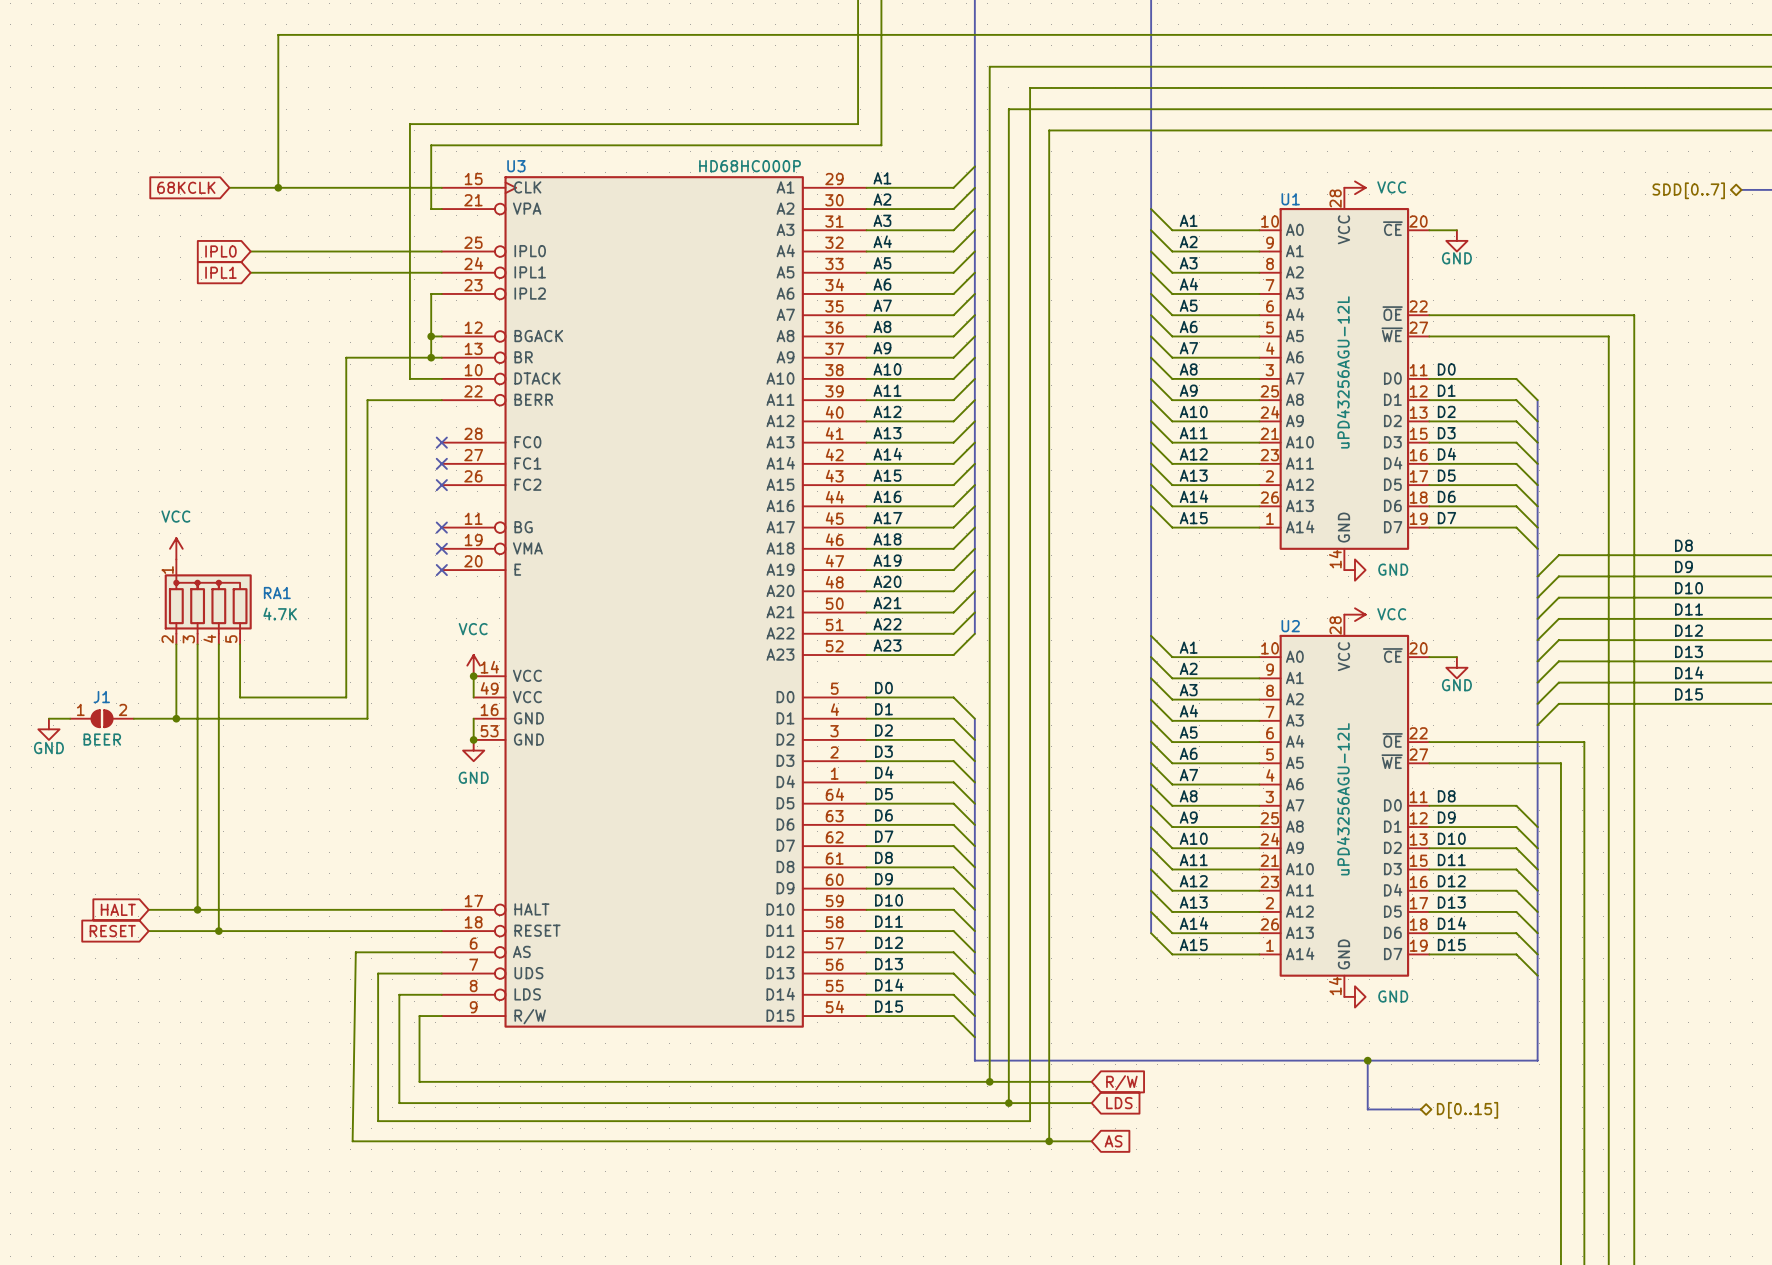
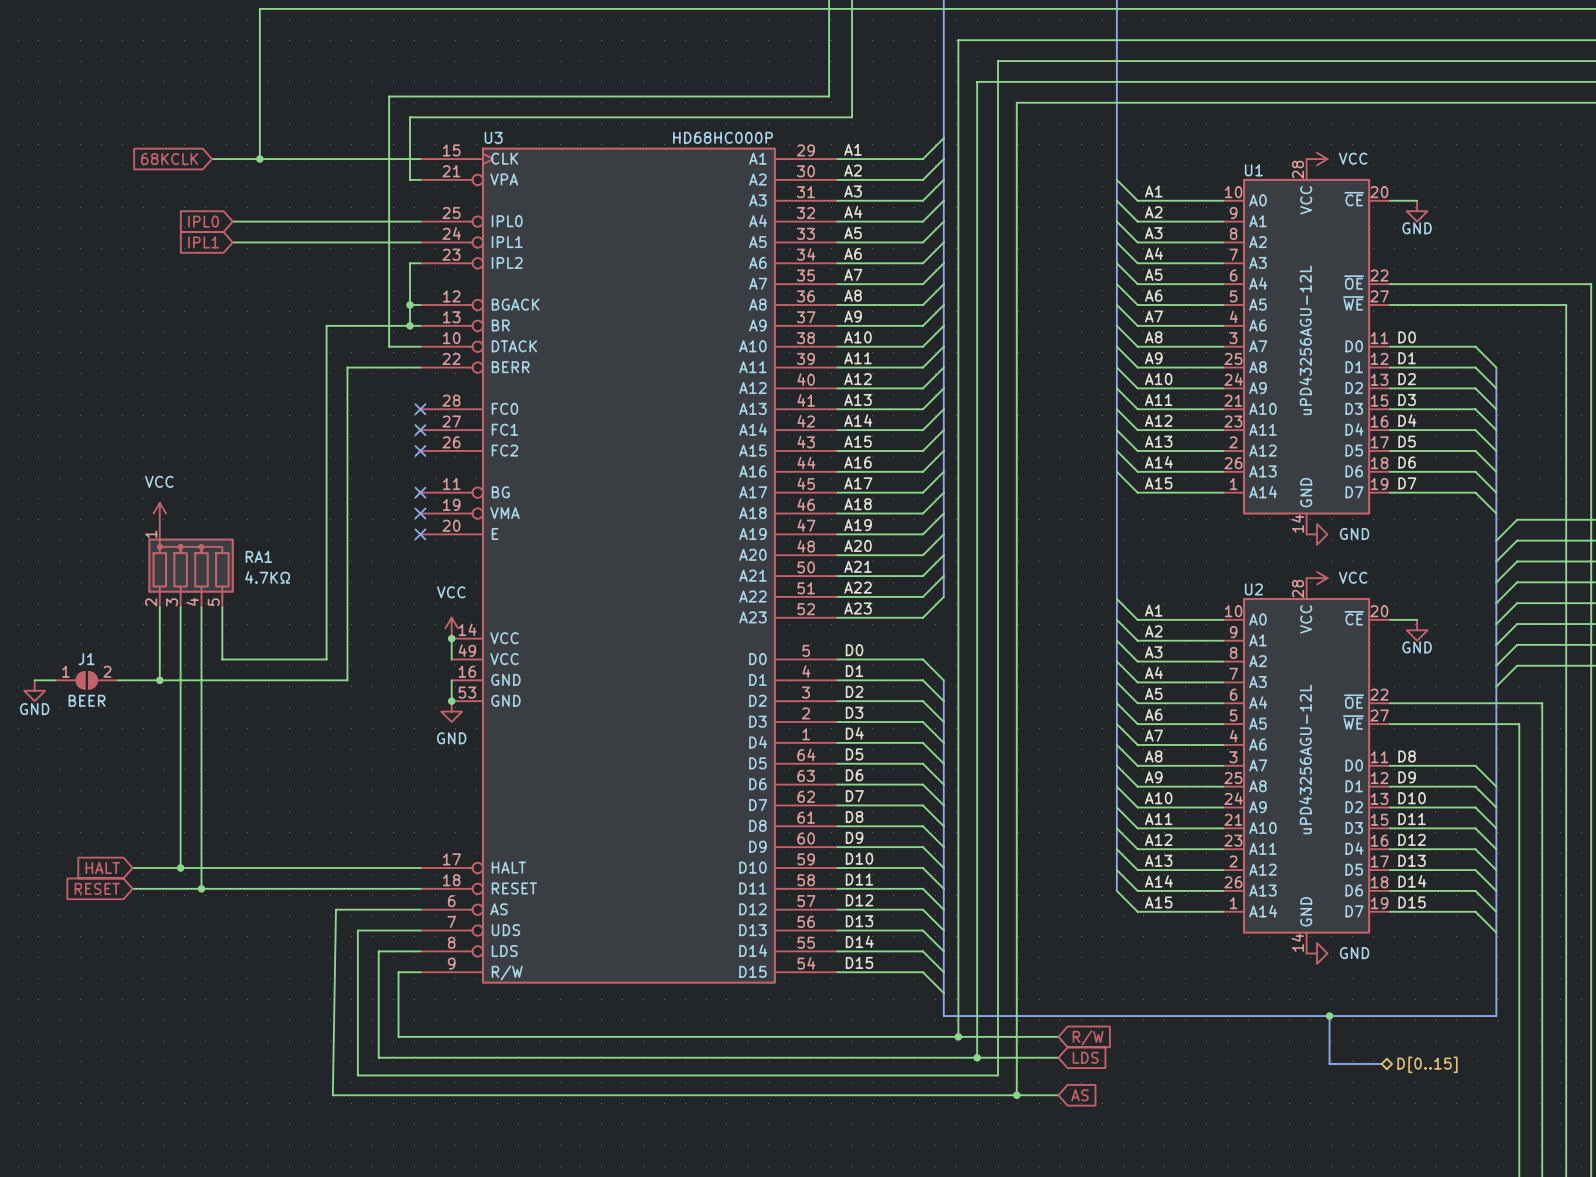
RA1 value: 4.7K (280, 614) -> 4.7KΩ (267, 577)

